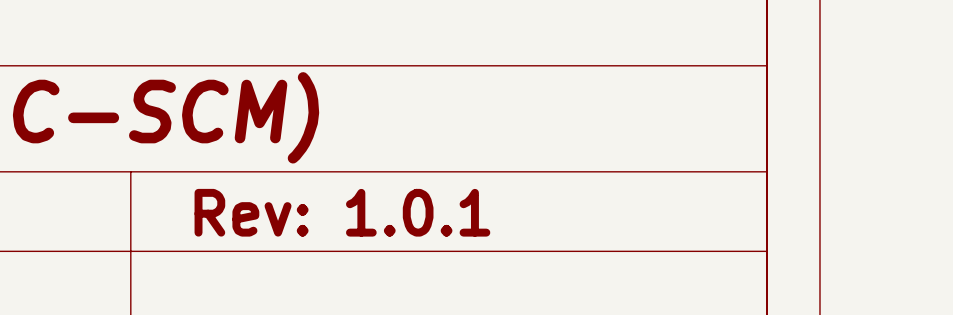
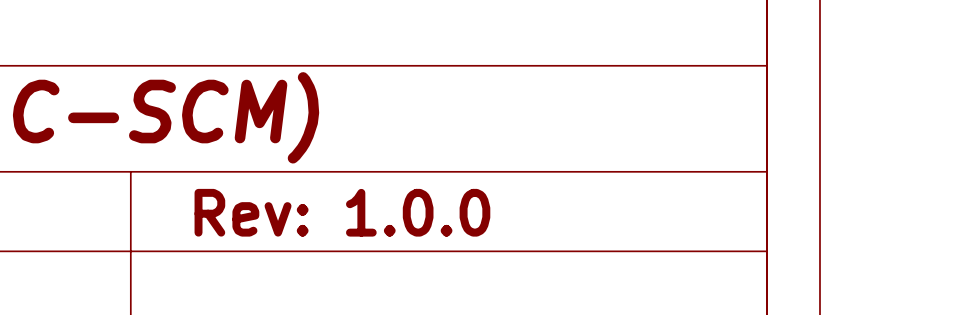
title block: Rev: 1.0.1 (342, 212) -> Rev: 1.0.0 (342, 212)

